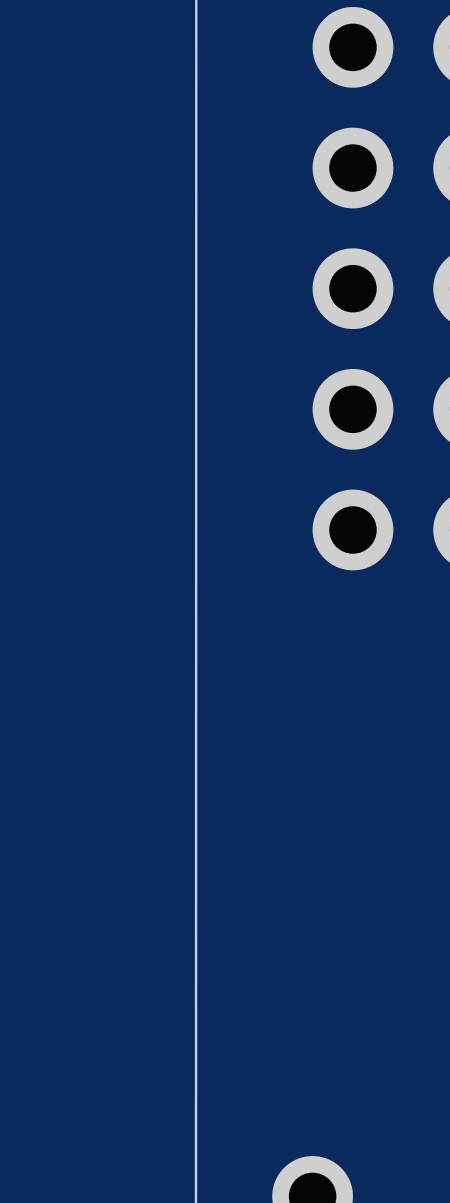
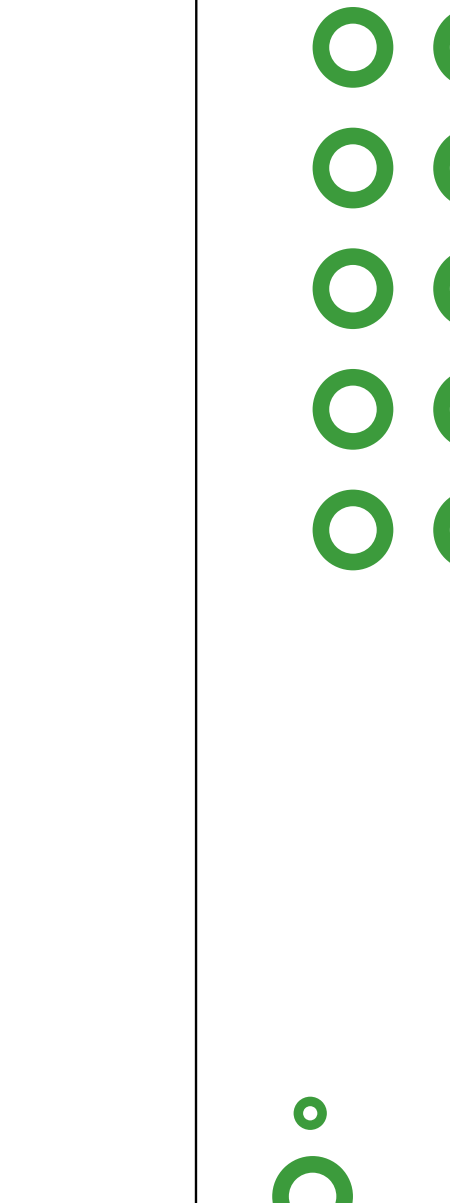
via: none -> (310, 1113)

